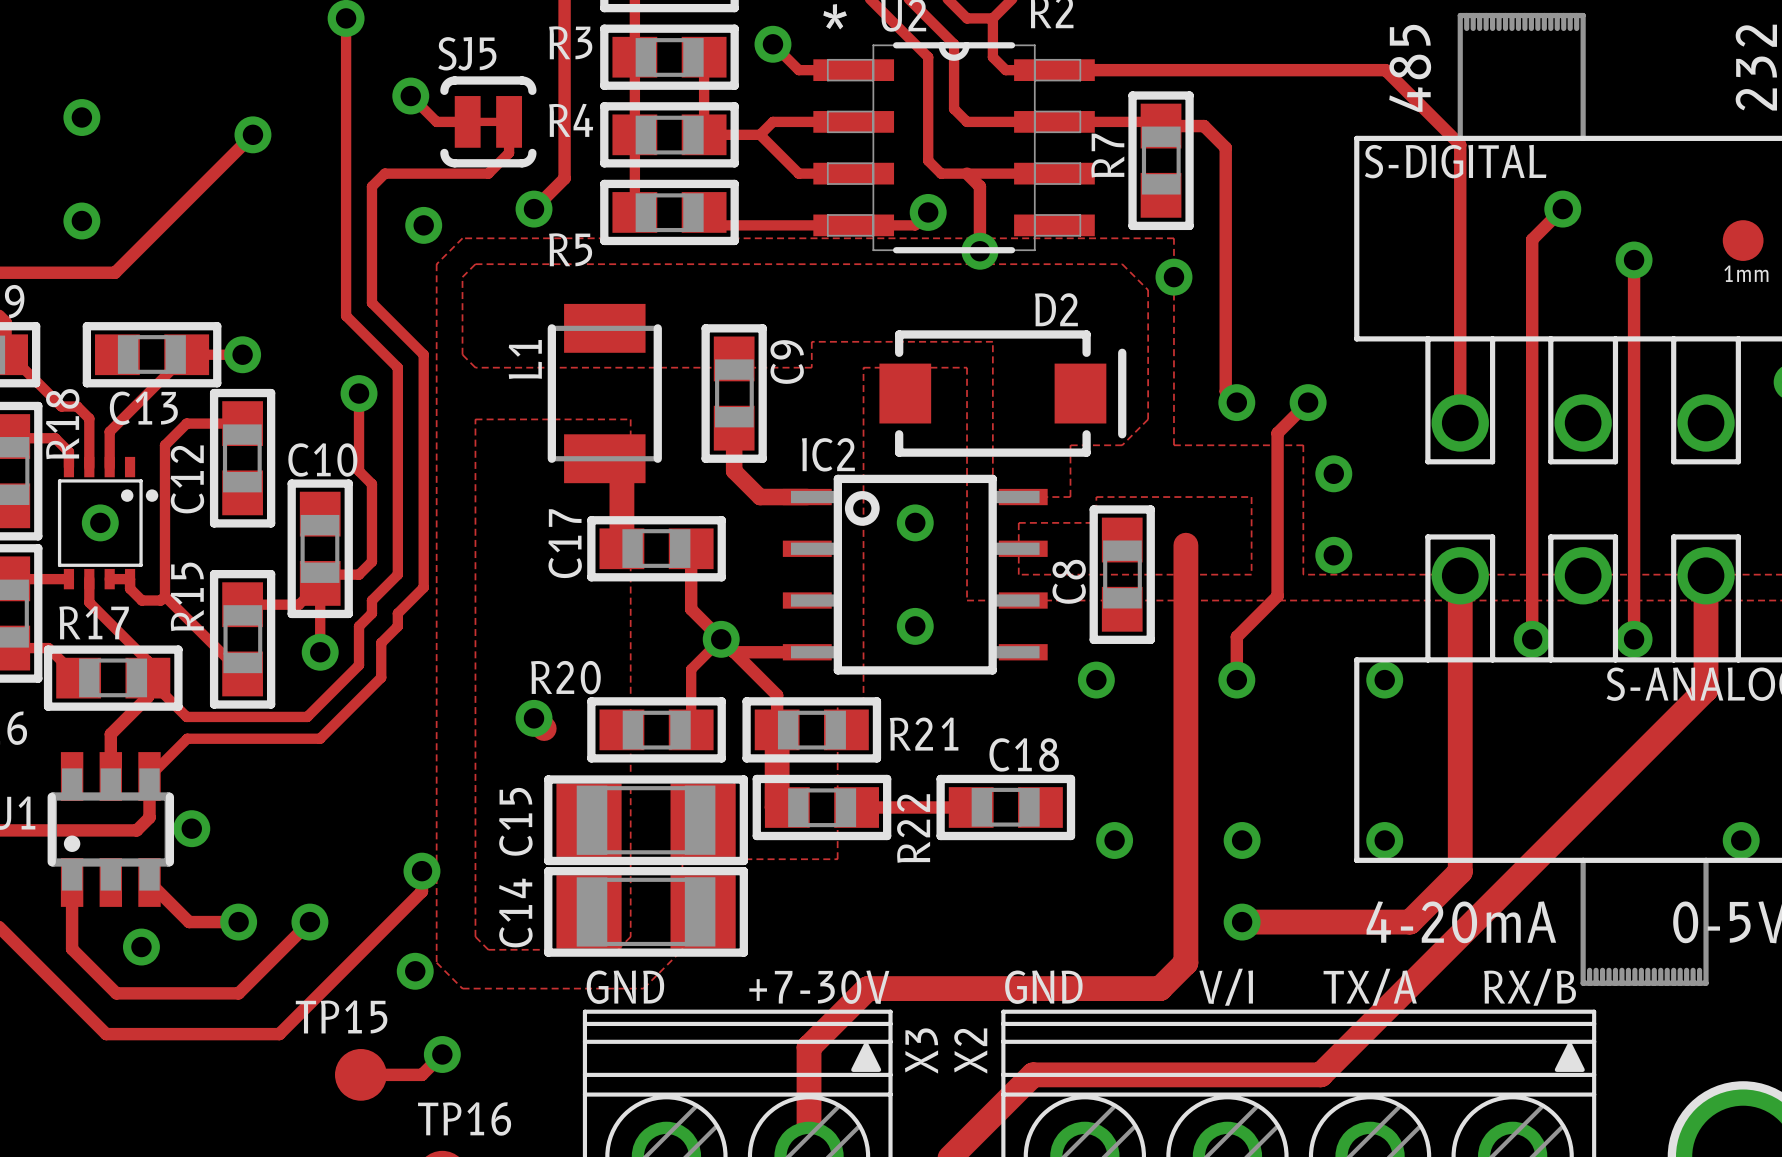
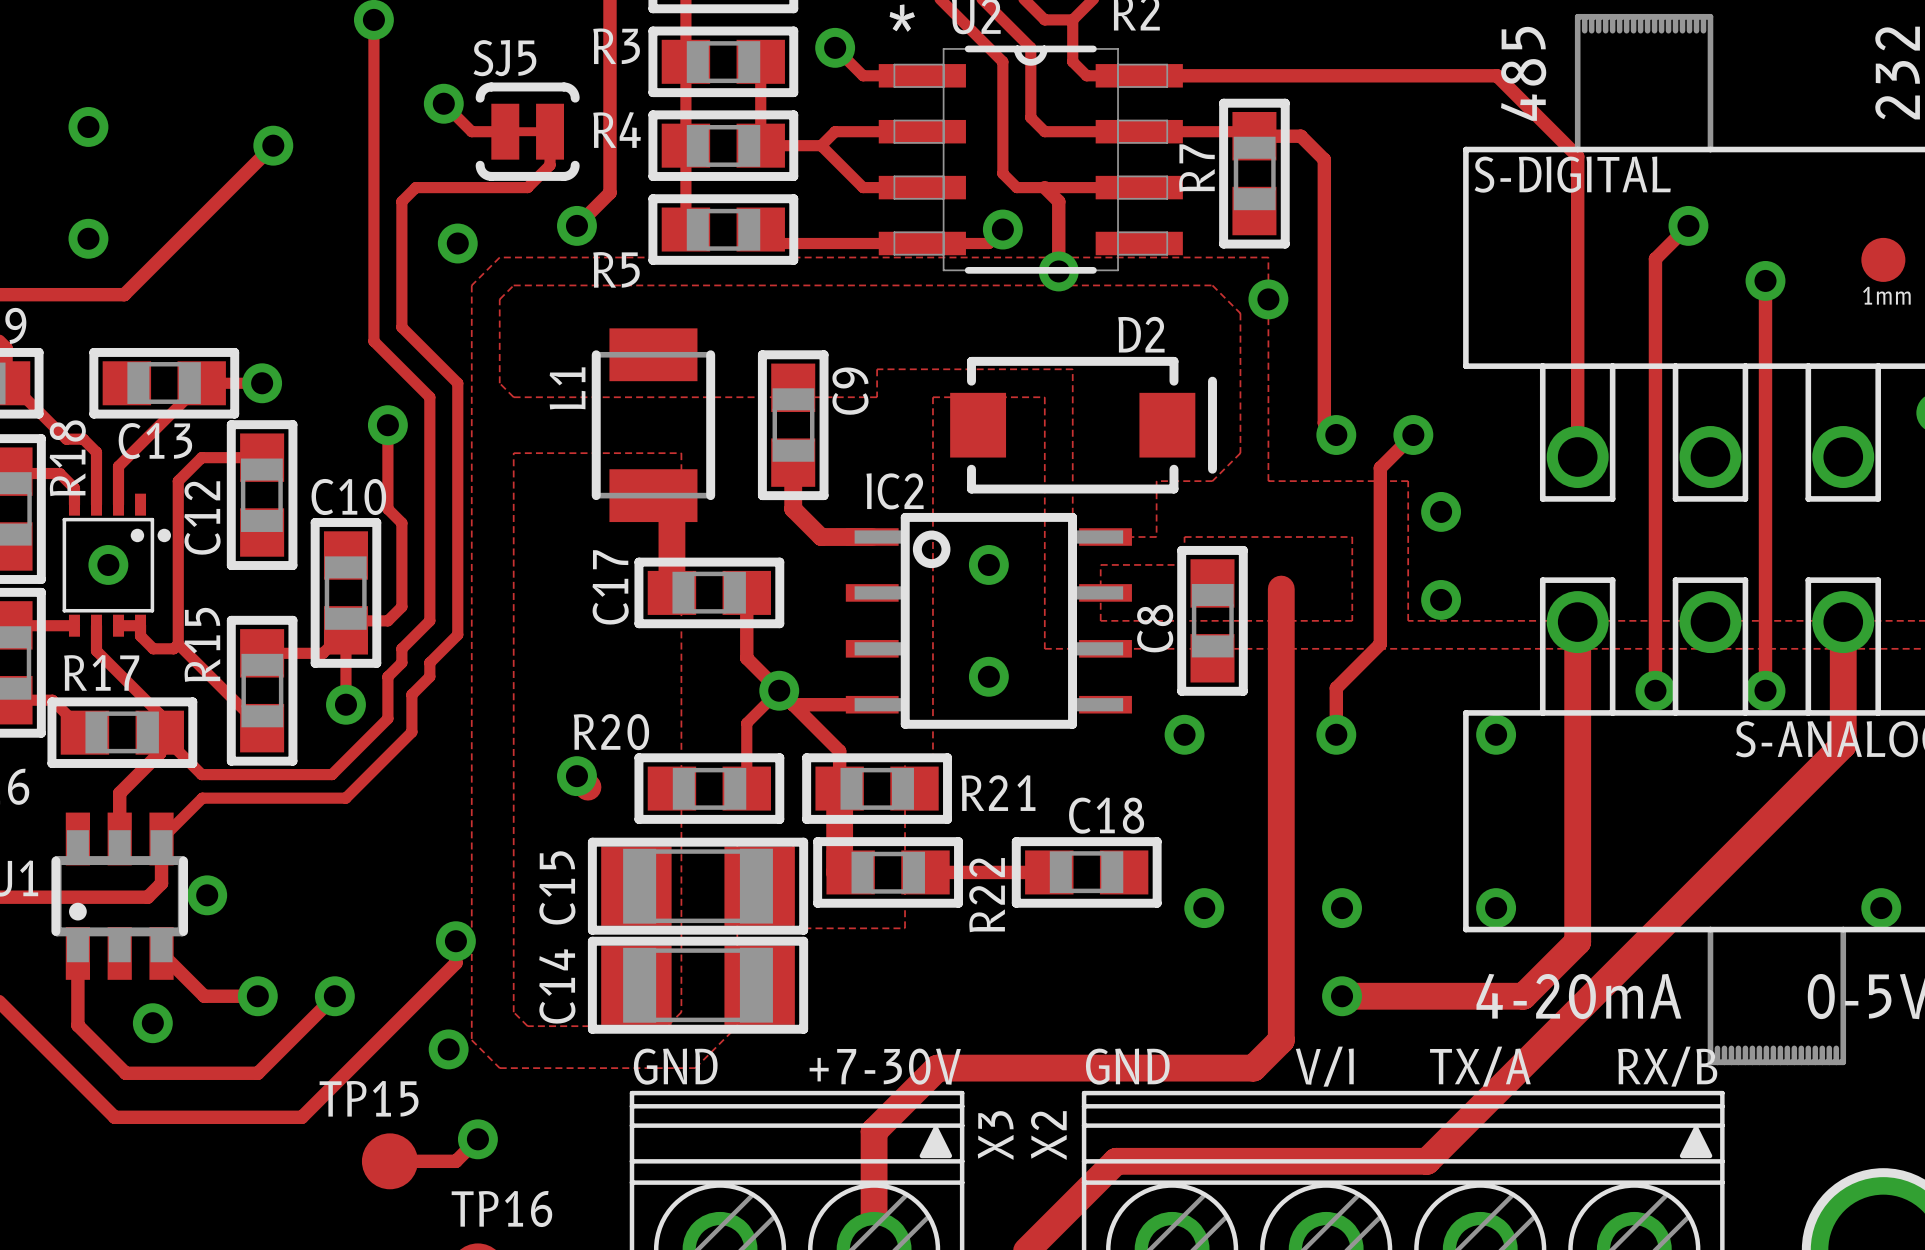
text position: RX/B (1530, 987) -> RX/B (1667, 1066)

